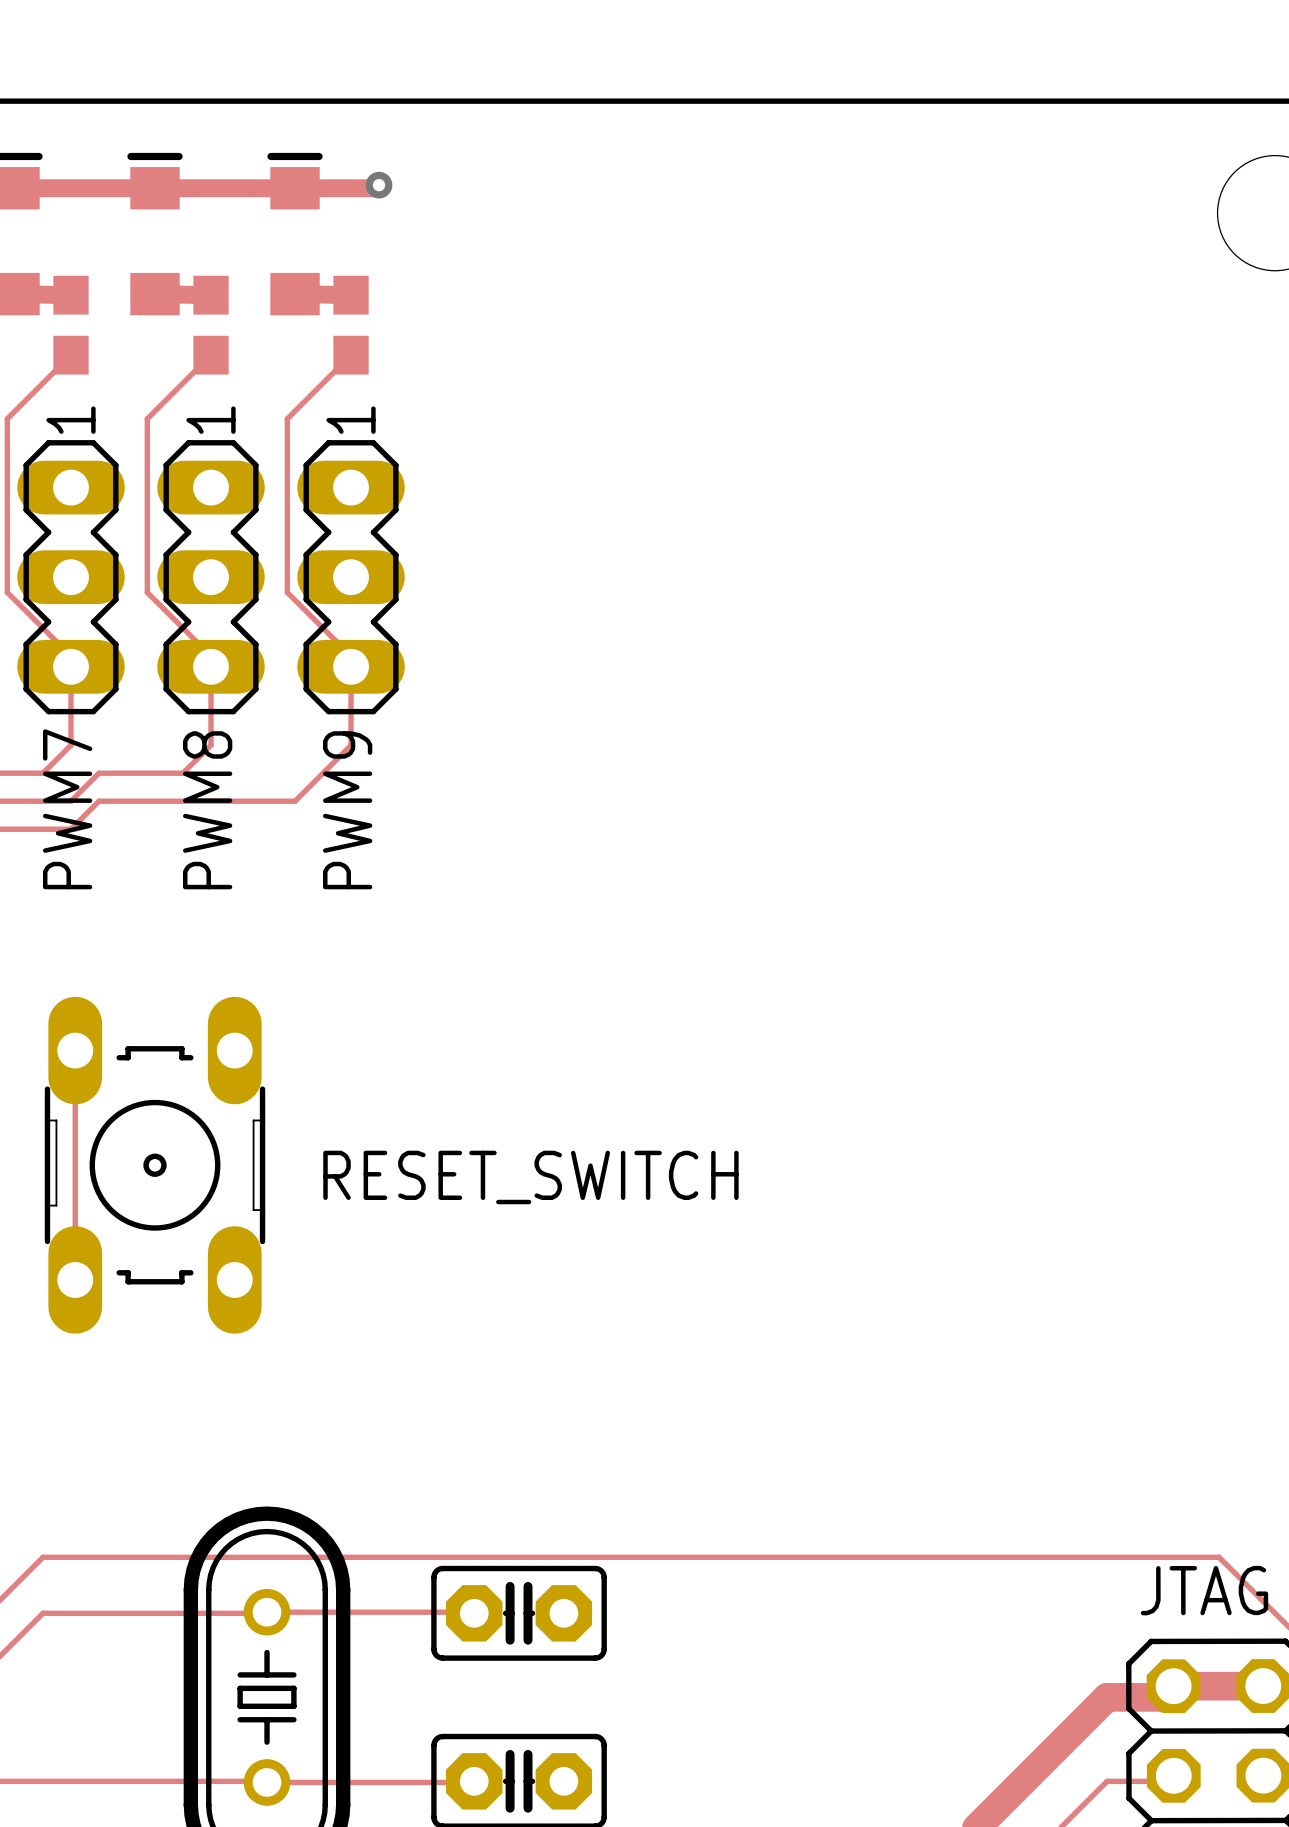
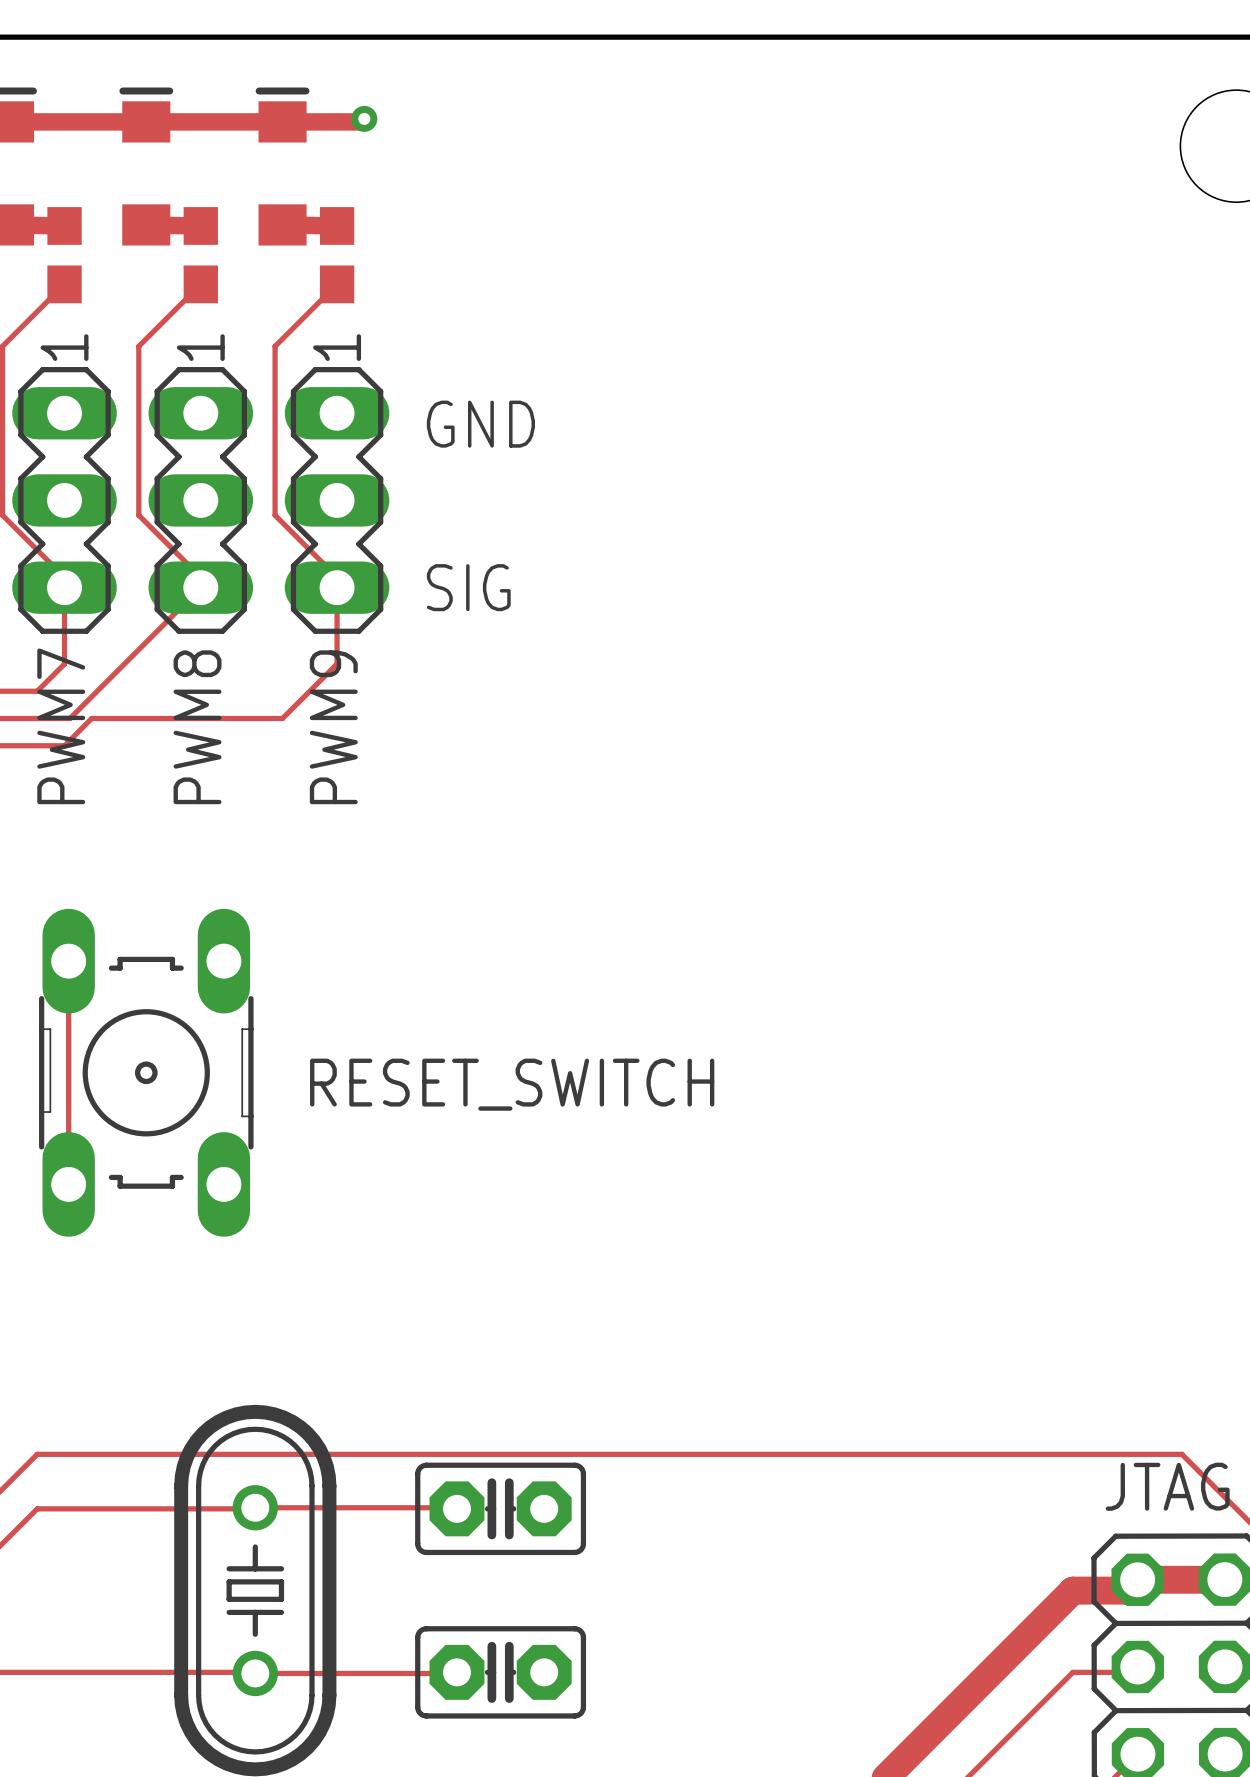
text: none -> GND (480, 424)
track: (211, 666) (211, 745) (183, 773) (99, 773) (71, 801) -> (200, 587) (69, 718) (64, 718)
text: none -> SIG (468, 587)

